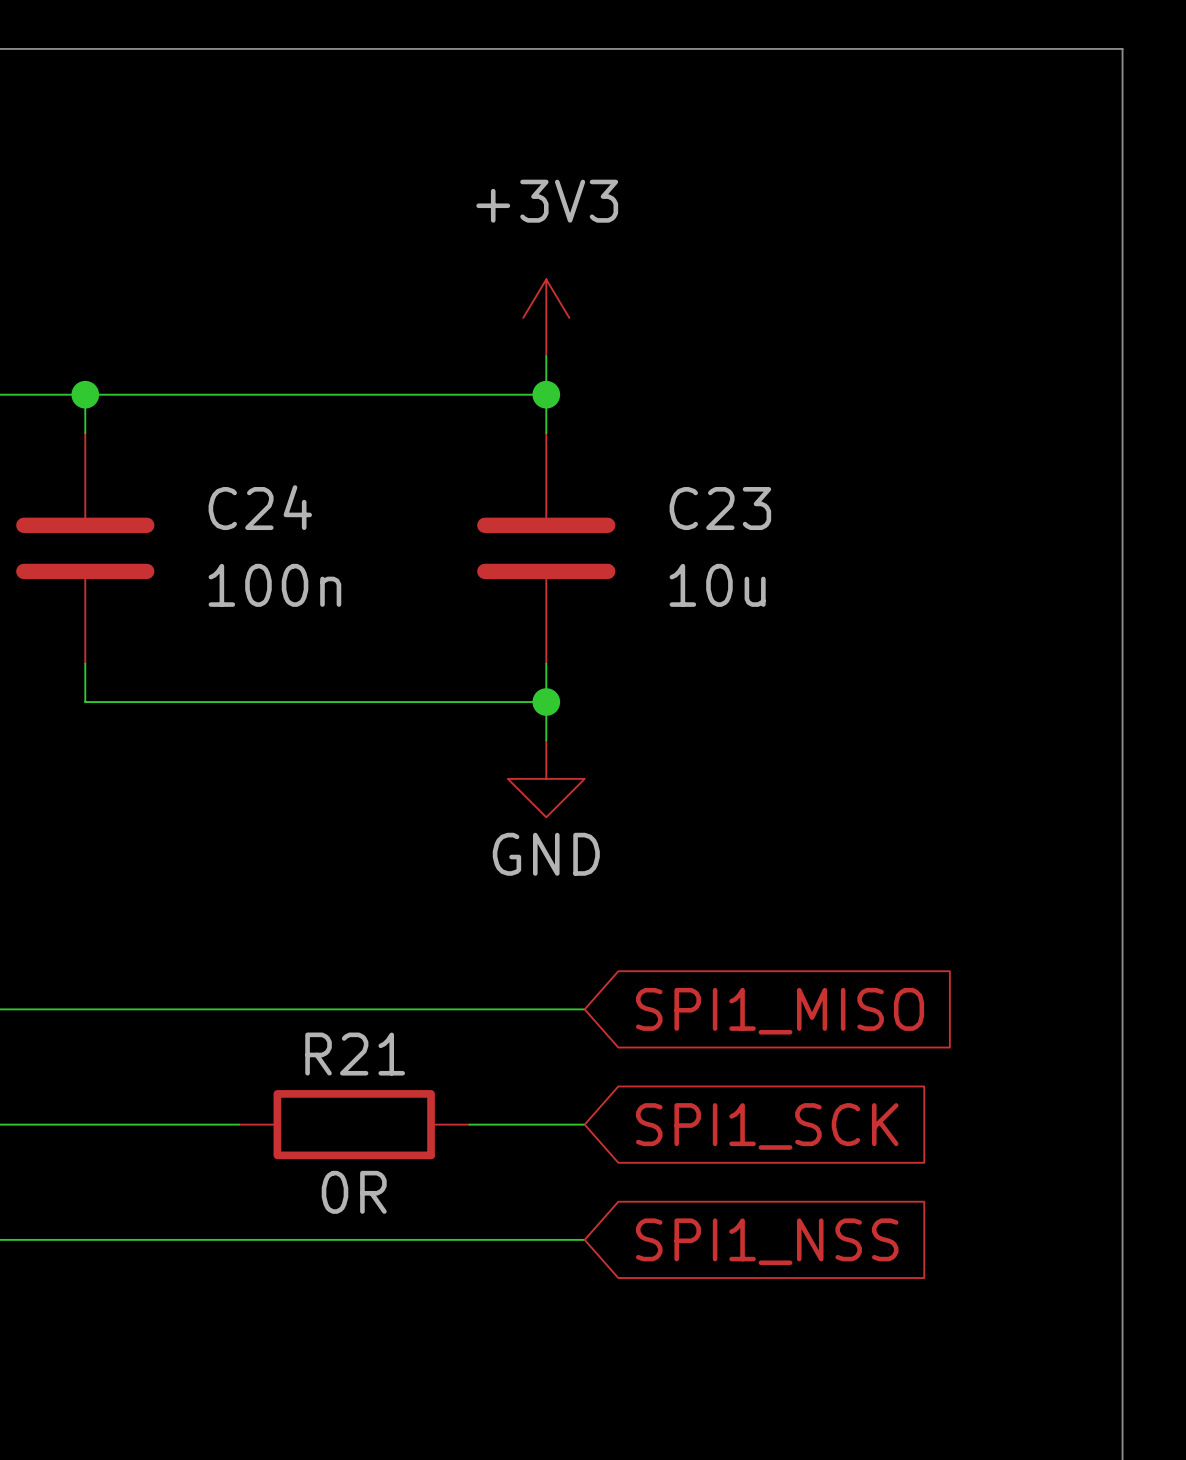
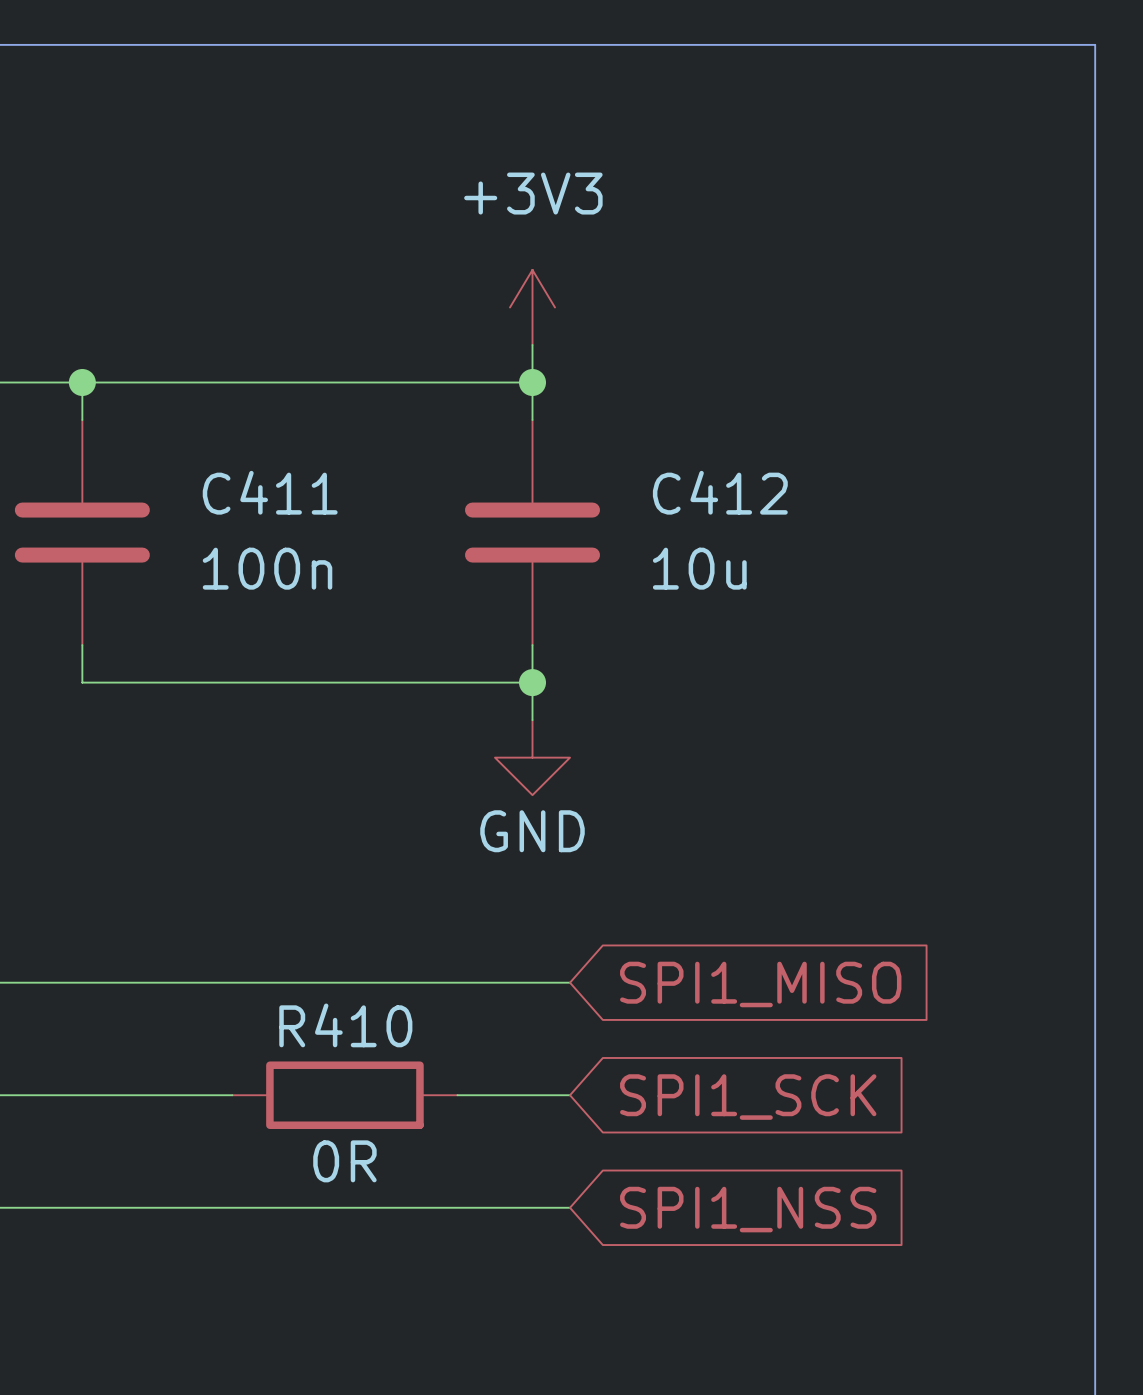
C24 name: C24 (260, 507) -> C411 (270, 492)
C23 name: C23 (720, 508) -> C412 (720, 492)
R21 name: R21 (355, 1054) -> R410 (345, 1025)

